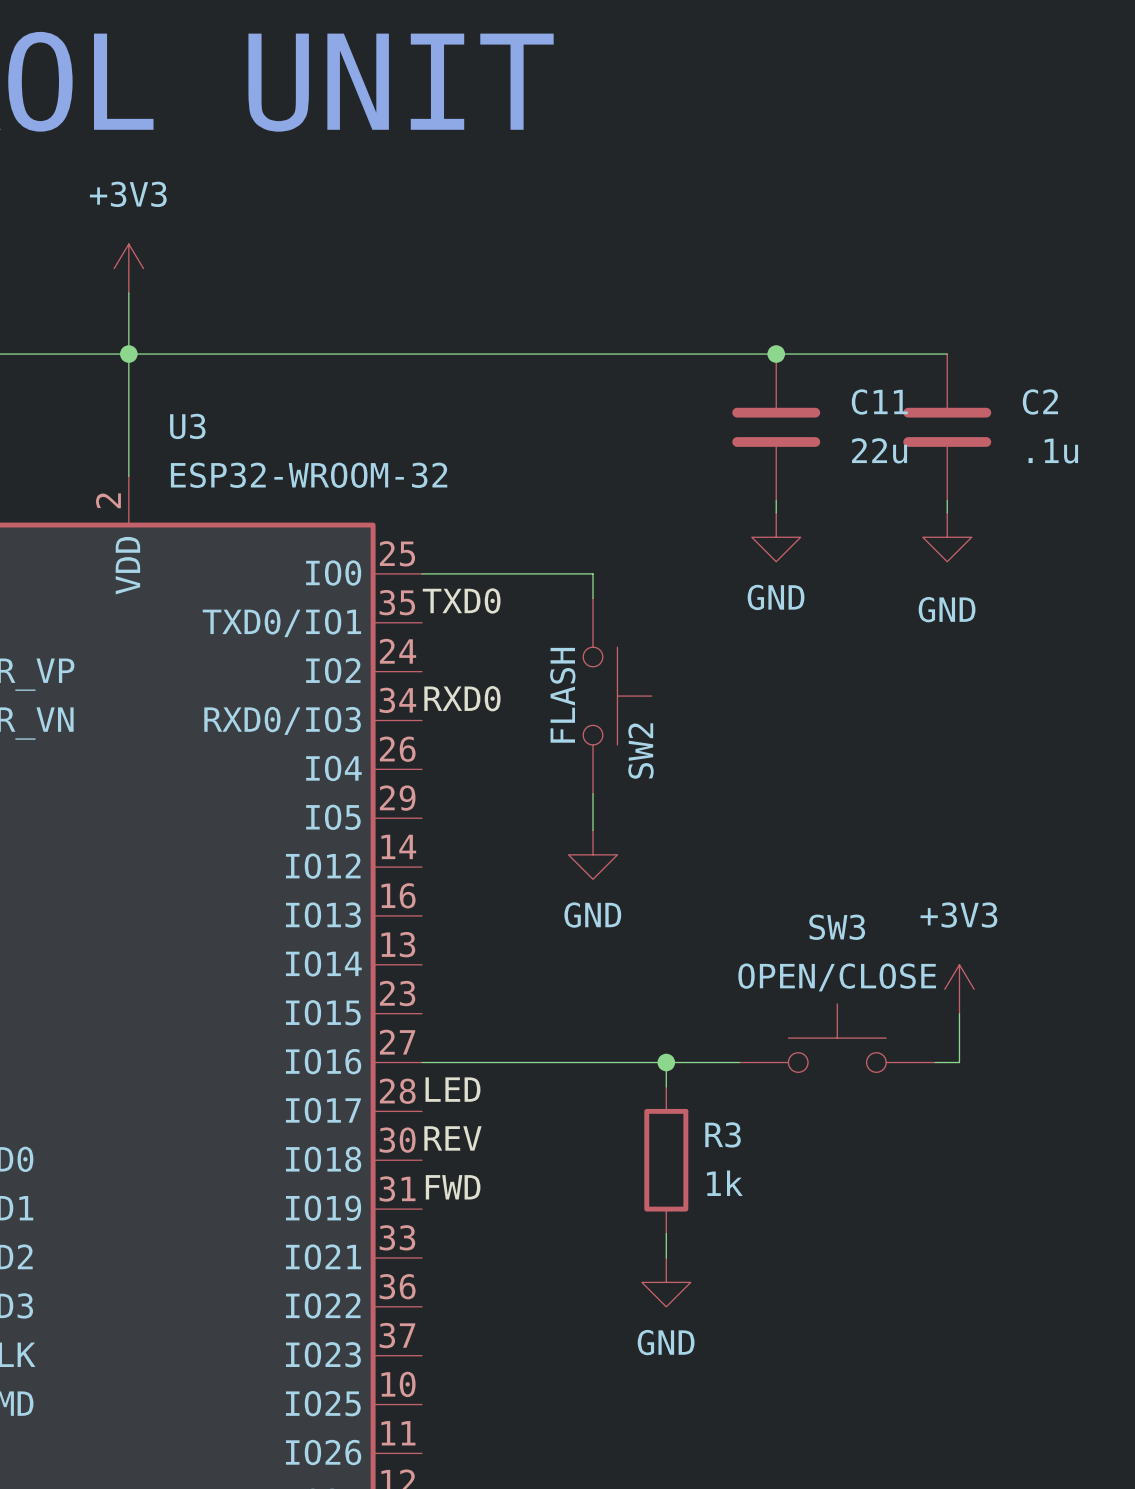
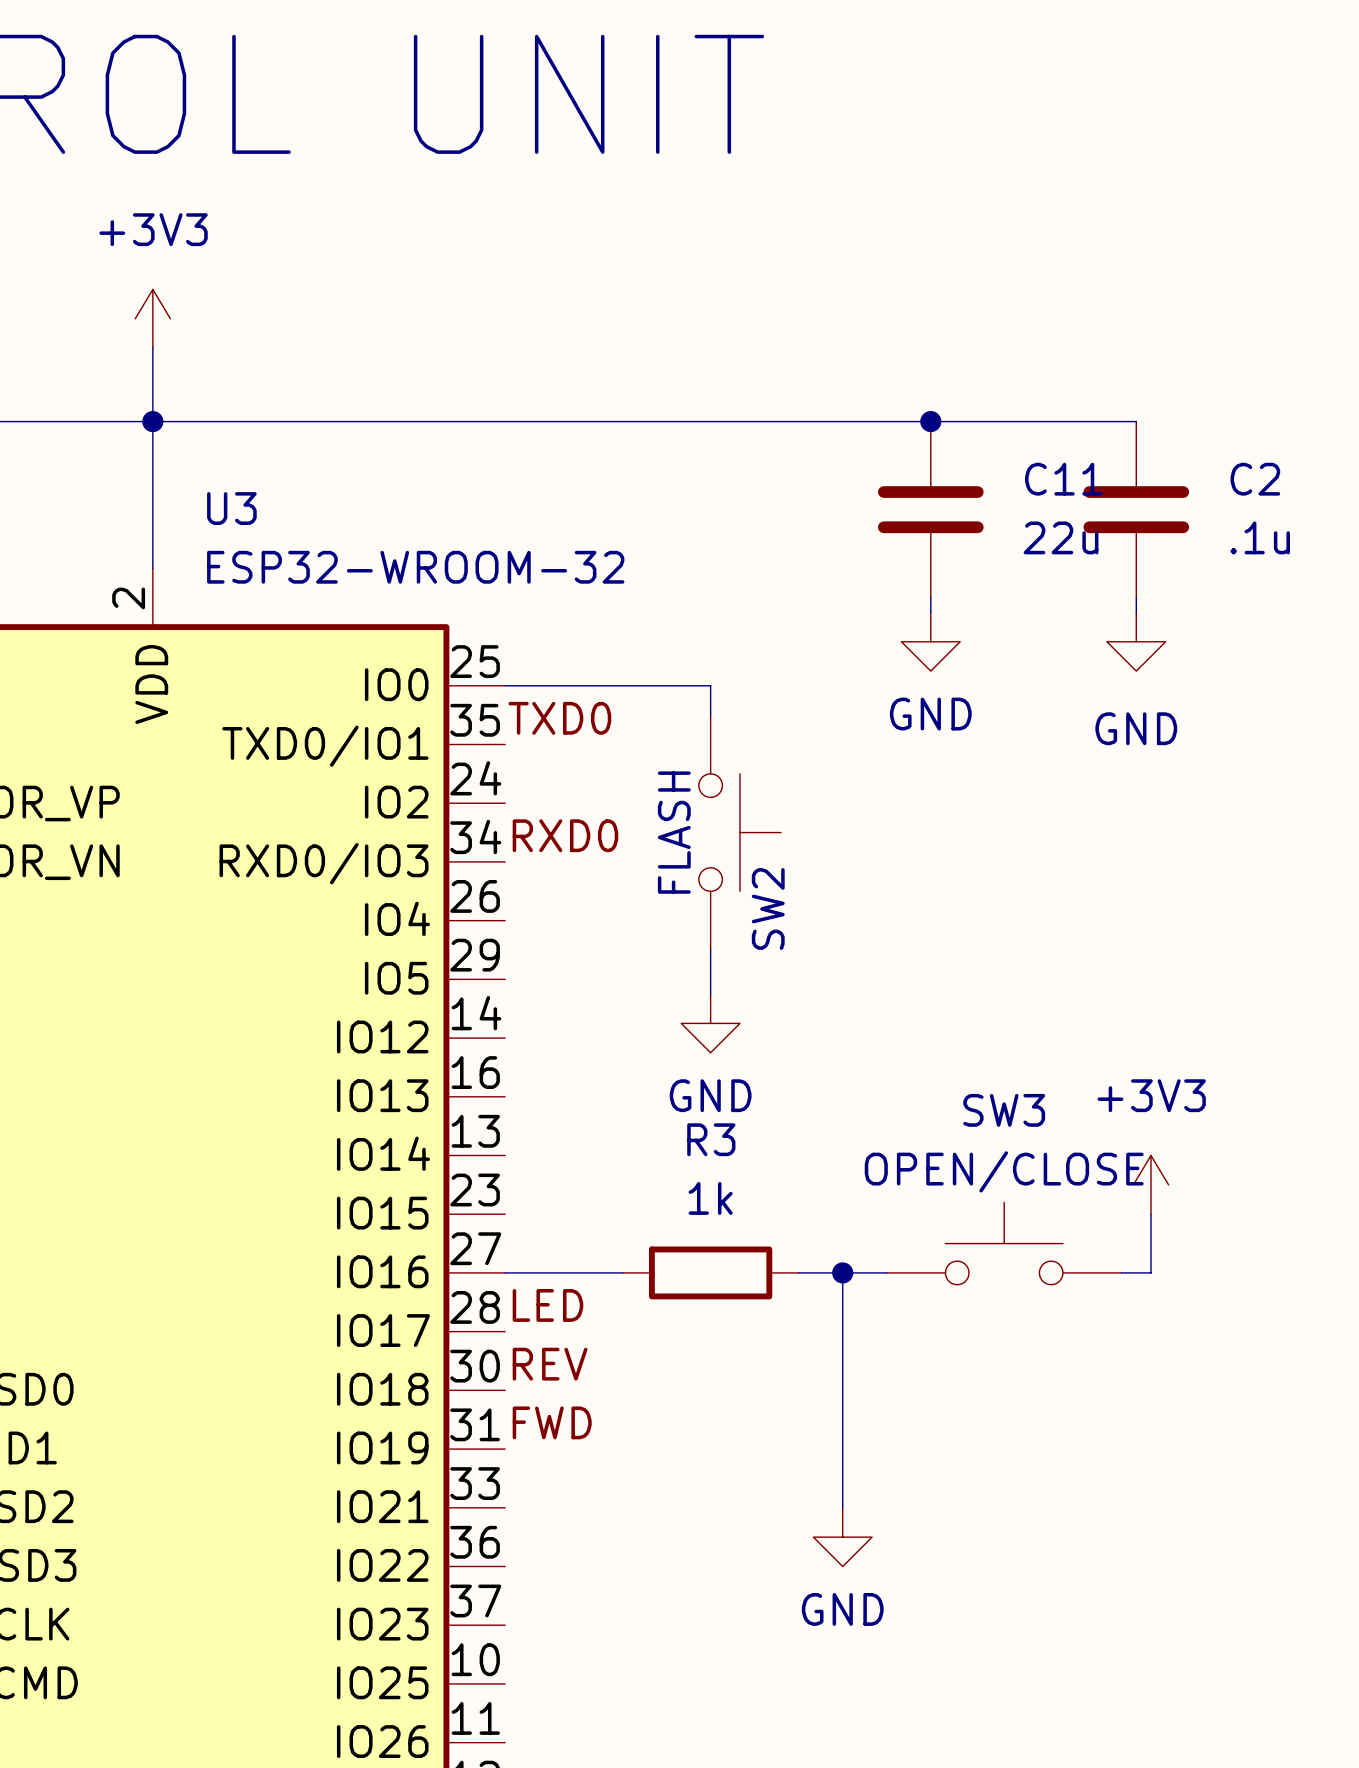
wire: (519, 1062) (666, 1062) (666, 1086) -> none
junction position: (666, 1062) -> (842, 1272)
wire: none -> (842, 1272) (842, 1507)
R3 name position: R3 (723, 1134) -> R3 (711, 1139)
R3 rotation: 0° (666, 1160) -> 90° clockwise (710, 1272)
R3 position: (666, 1160) -> (710, 1272)
R3 value position: 1k (724, 1183) -> 1k (710, 1198)
wire: (666, 1233) (666, 1257) -> none
power symbol position: GND (666, 1282) -> GND (842, 1537)

